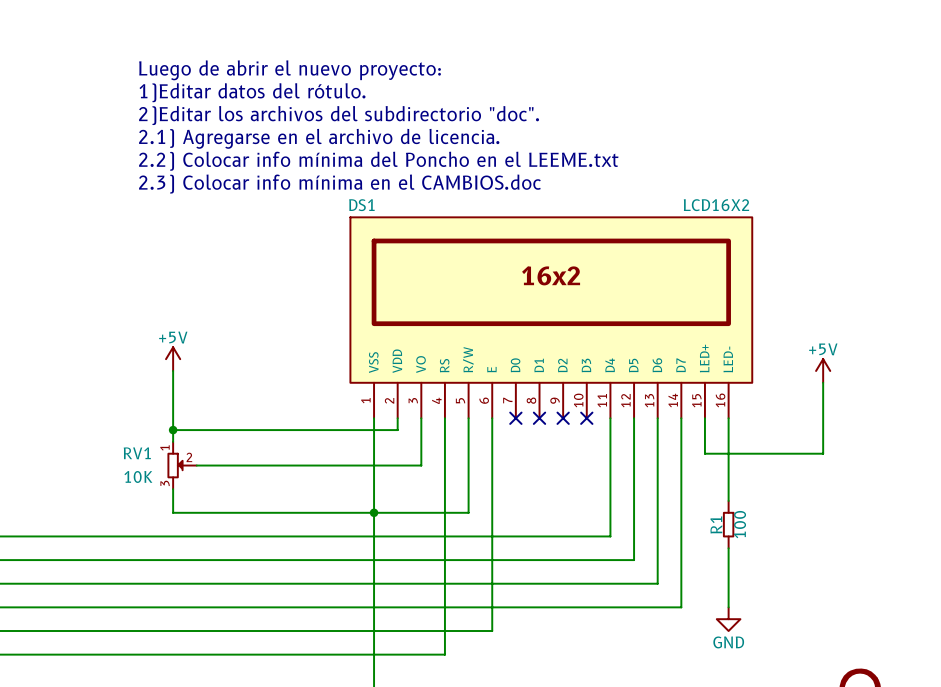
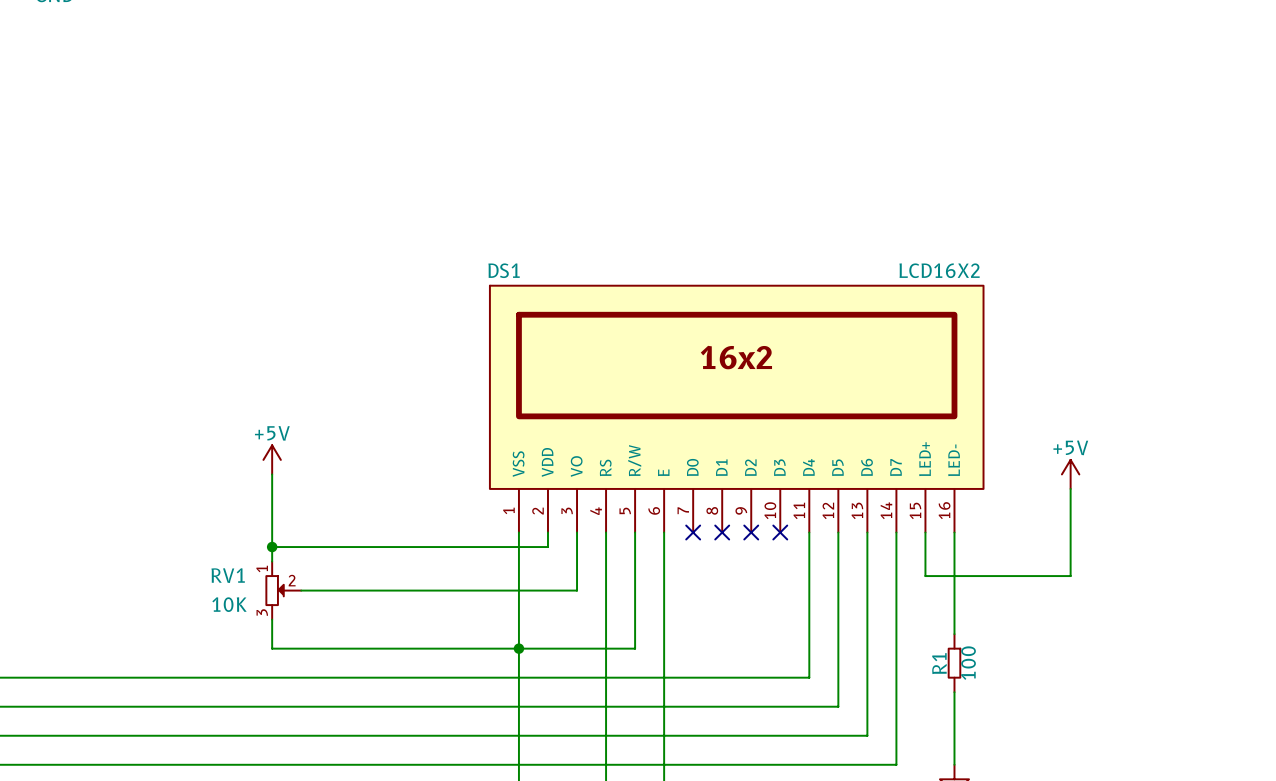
text: Luego de abrir el nuevo proyecto: (290, 70) -> none
text: 1)Editar datos del rótulo. (252, 92) -> none
text: 2)Editar los archivos del subdirectorio "doc". (339, 115) -> none
text: 2.1) Agregarse en el archivo de licencia. (319, 138) -> none
text: 2.2) Colocar info mínima del Poncho en el LEEME.txt (378, 161) -> none
text: 2.3) Colocar info mínima en el CAMBIOS.doc (339, 184) -> none

